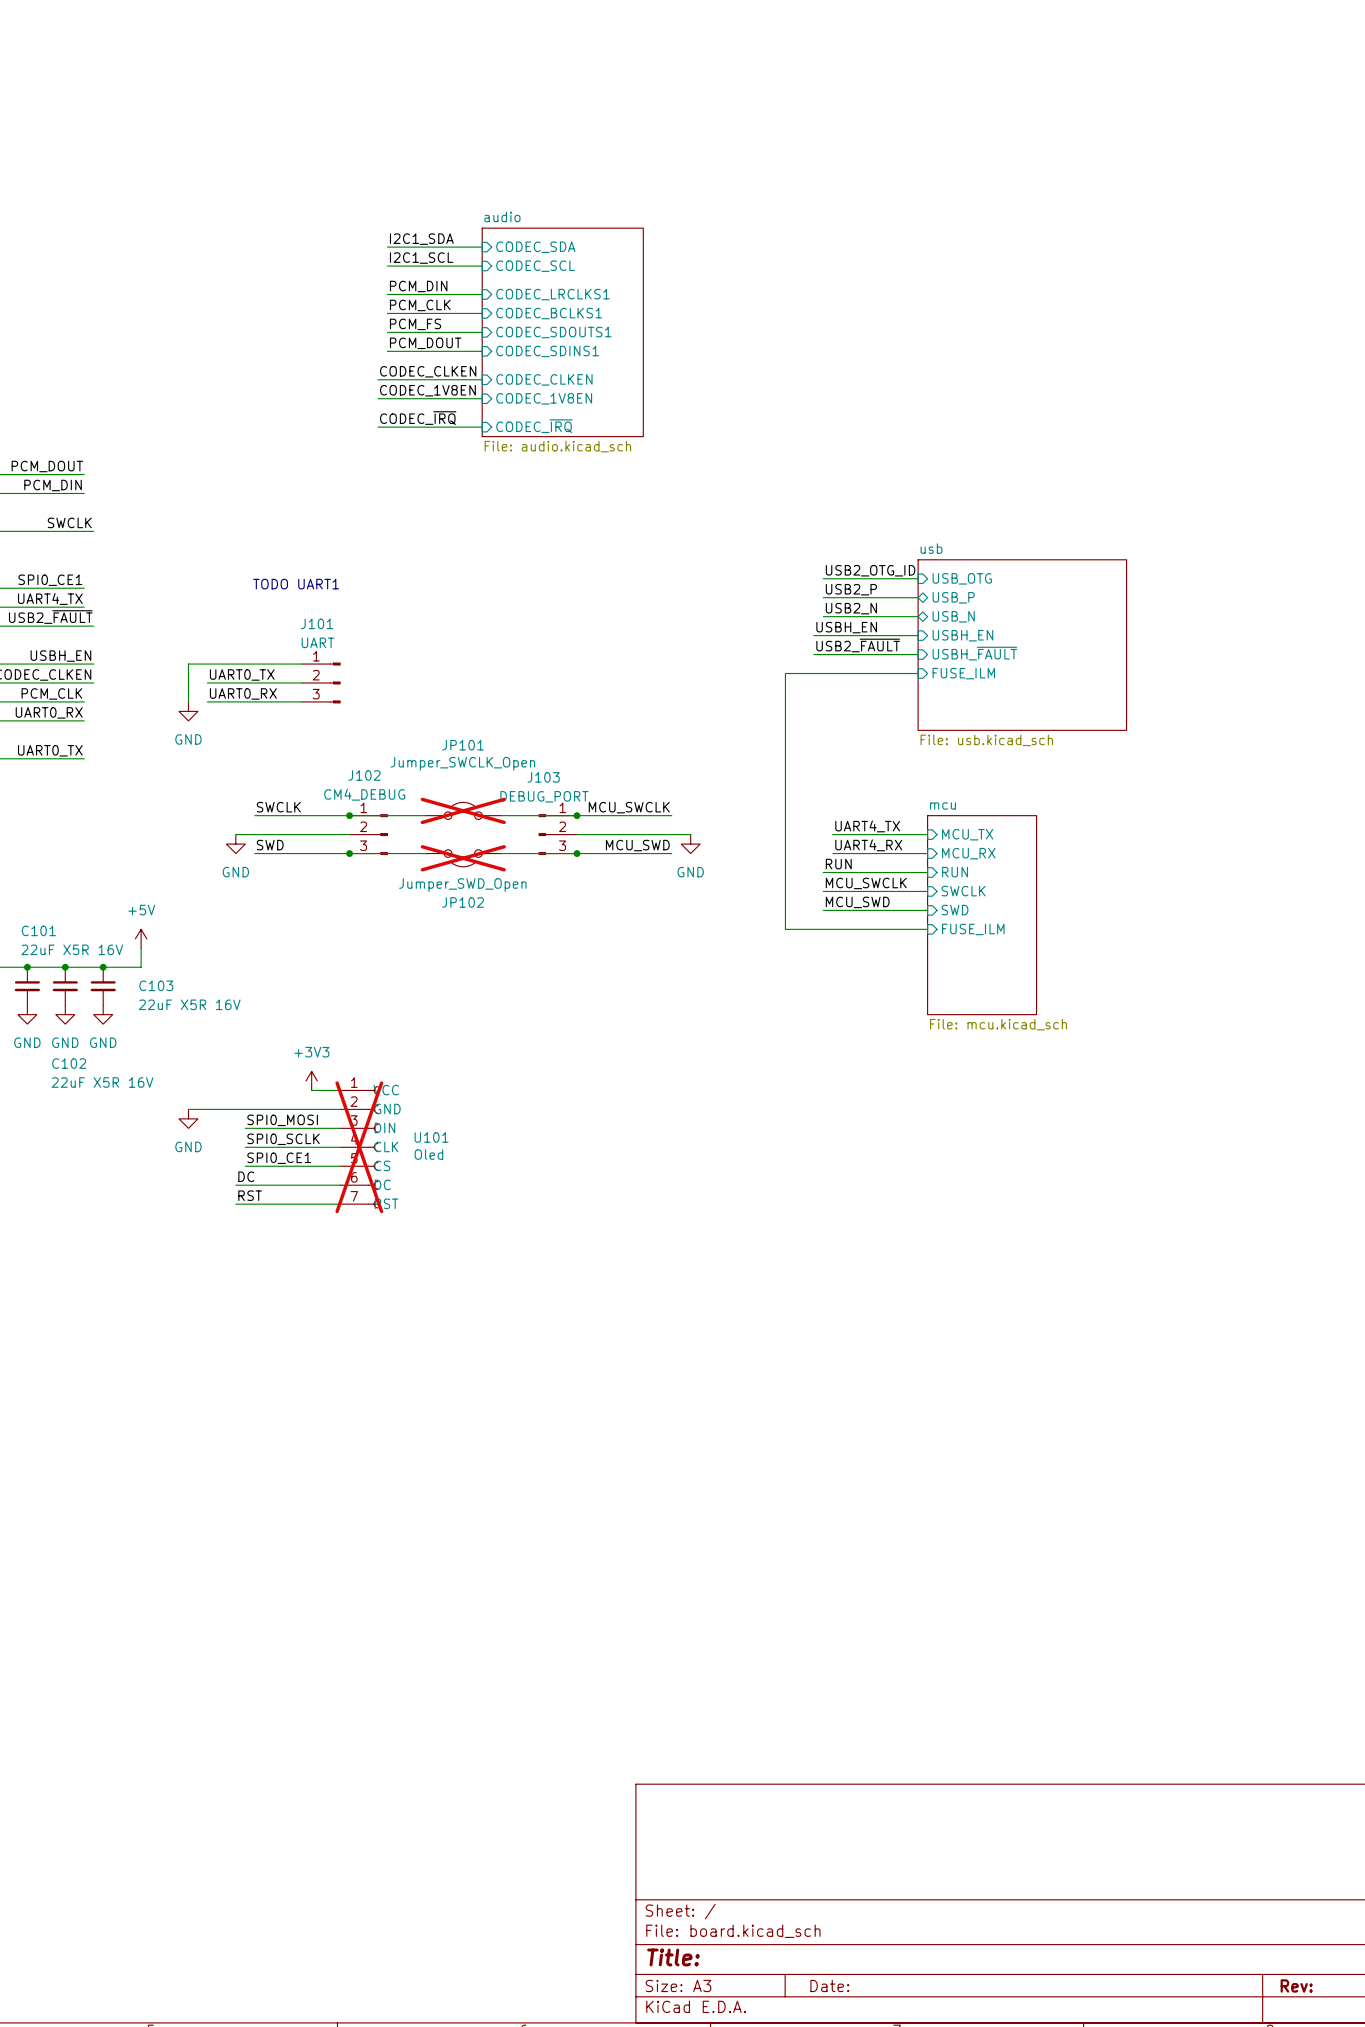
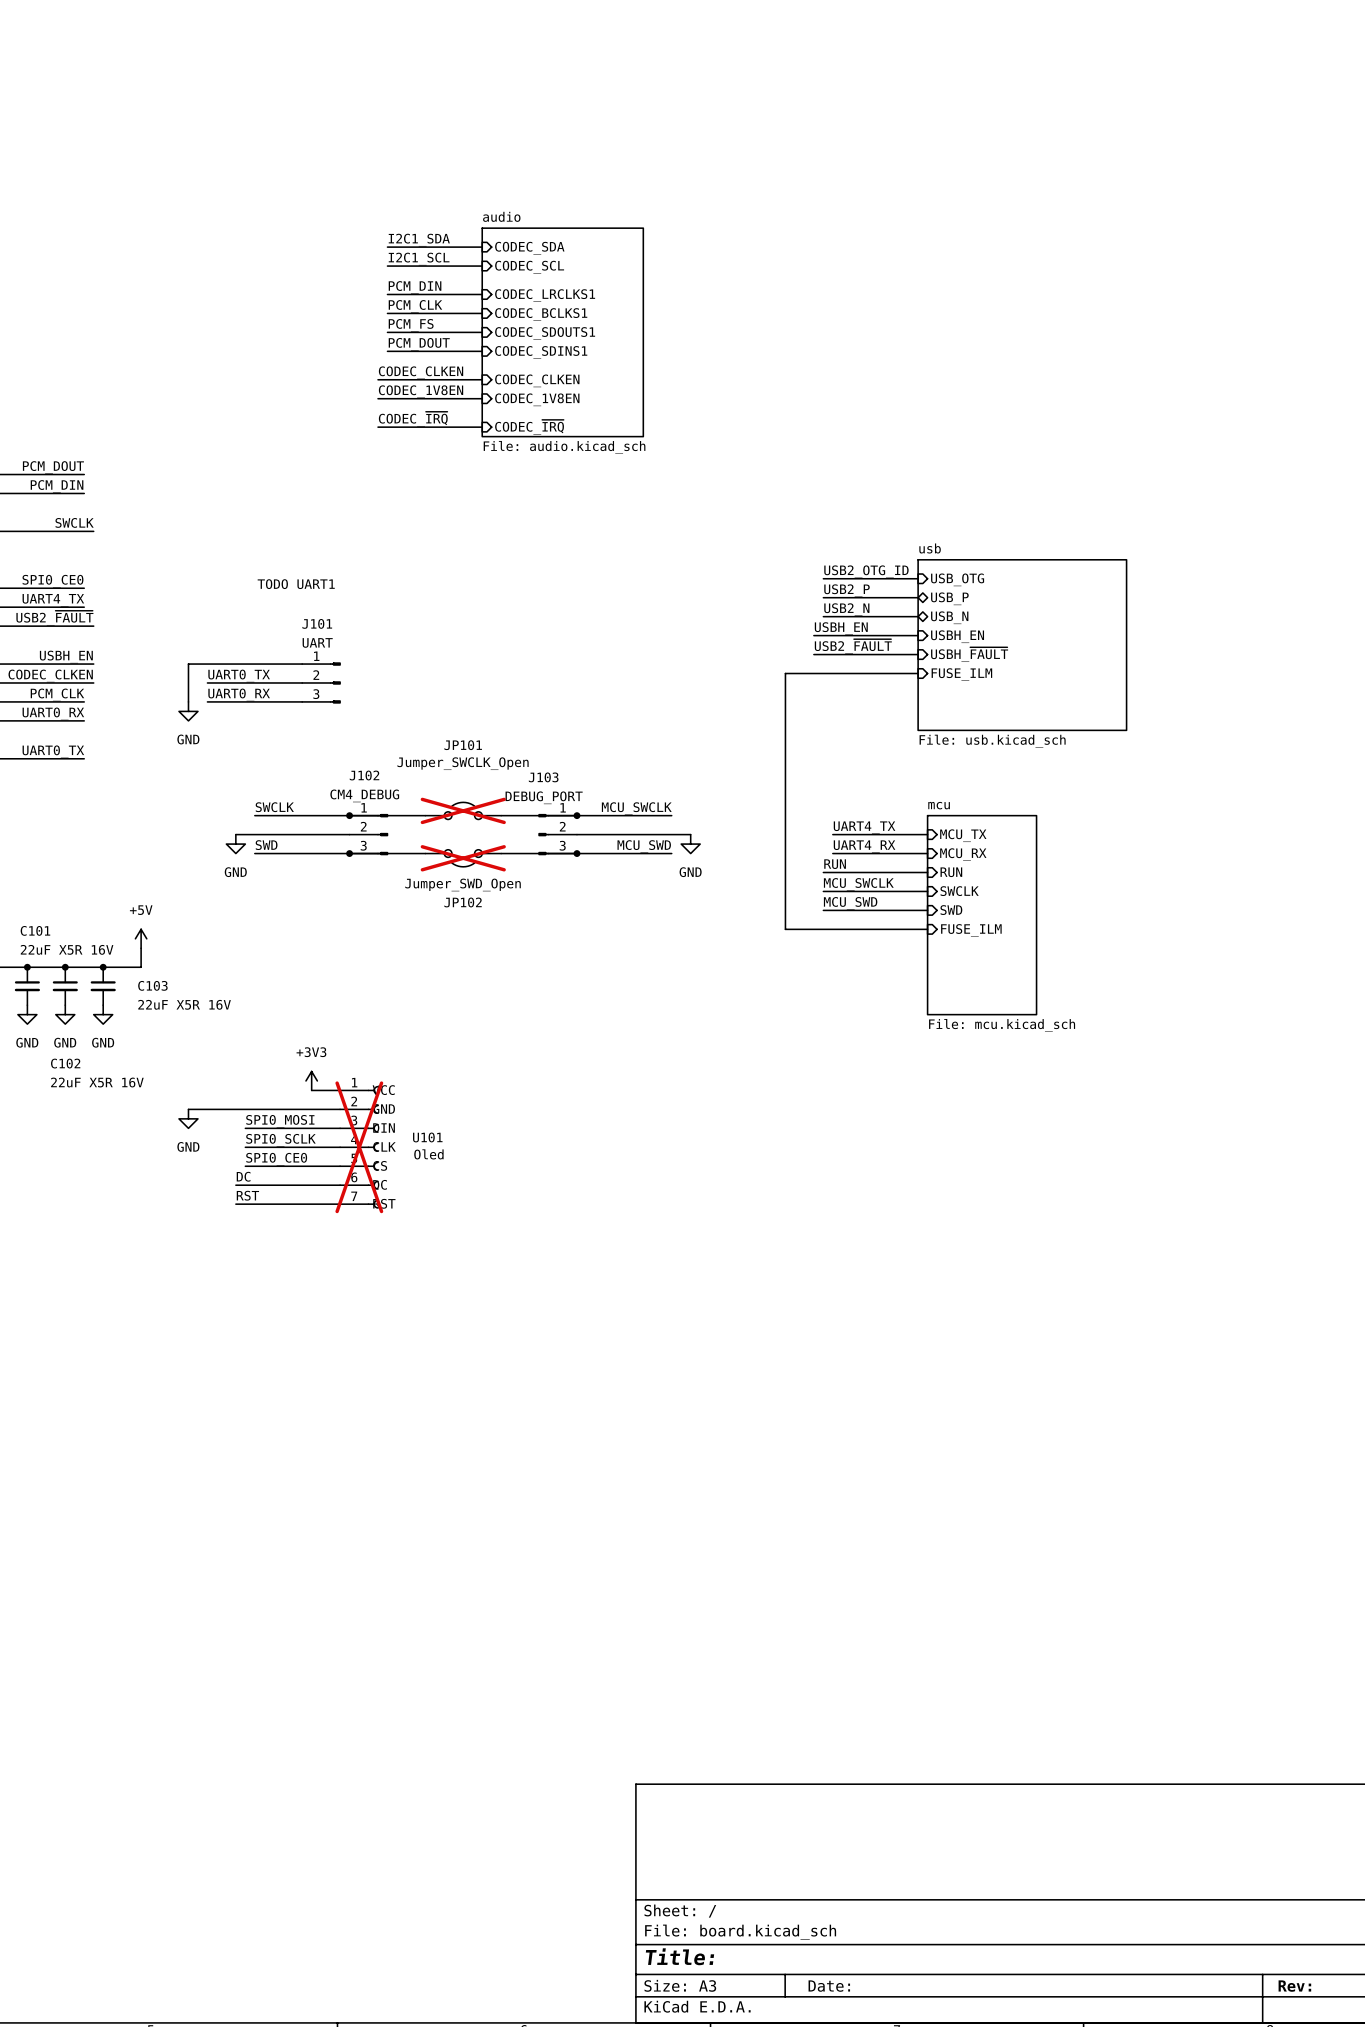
label: SPI0_CE1 (50, 580) -> SPI0_CE0 (52, 581)
label: SPI0_CE1 (279, 1158) -> SPI0_CE0 (276, 1159)

